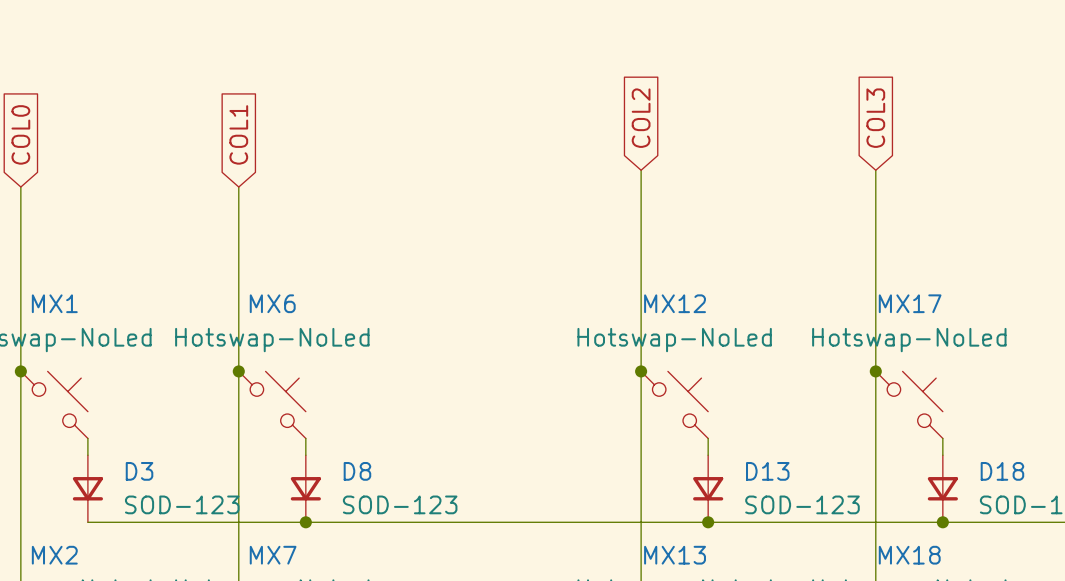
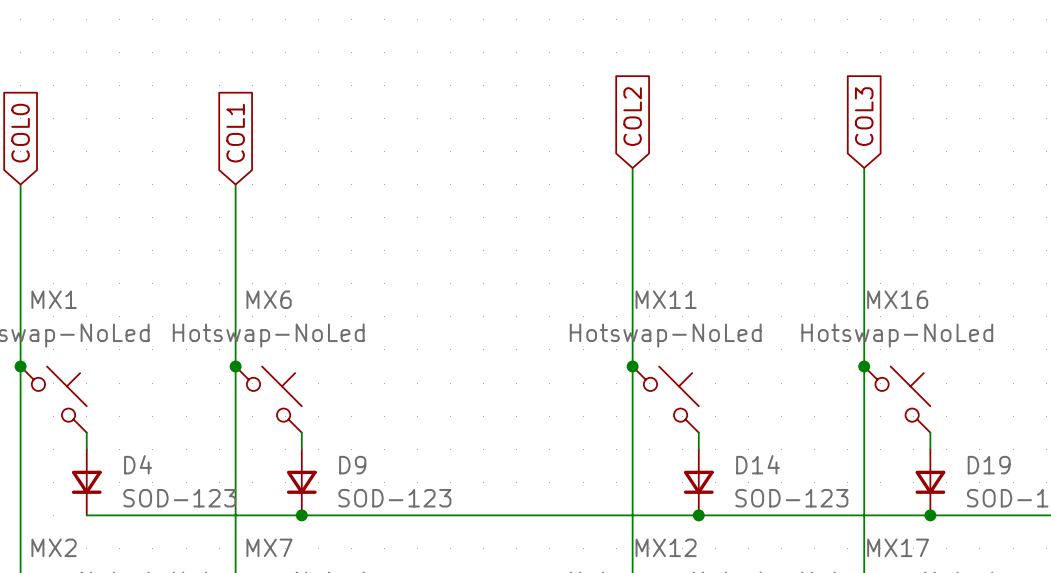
MX12 name: MX12 (675, 303) -> MX11 (666, 299)
MX17 name: MX17 (910, 303) -> MX16 (897, 299)
D3 name: D3 (139, 471) -> D4 (138, 464)
D8 name: D8 (357, 471) -> D9 (352, 465)
D13 name: D13 (767, 471) -> D14 (757, 464)
D18 name: D18 (1002, 471) -> D19 (989, 465)
MX13 name: MX13 (675, 555) -> MX12 (666, 547)
MX18 name: MX18 (909, 555) -> MX17 (898, 547)

